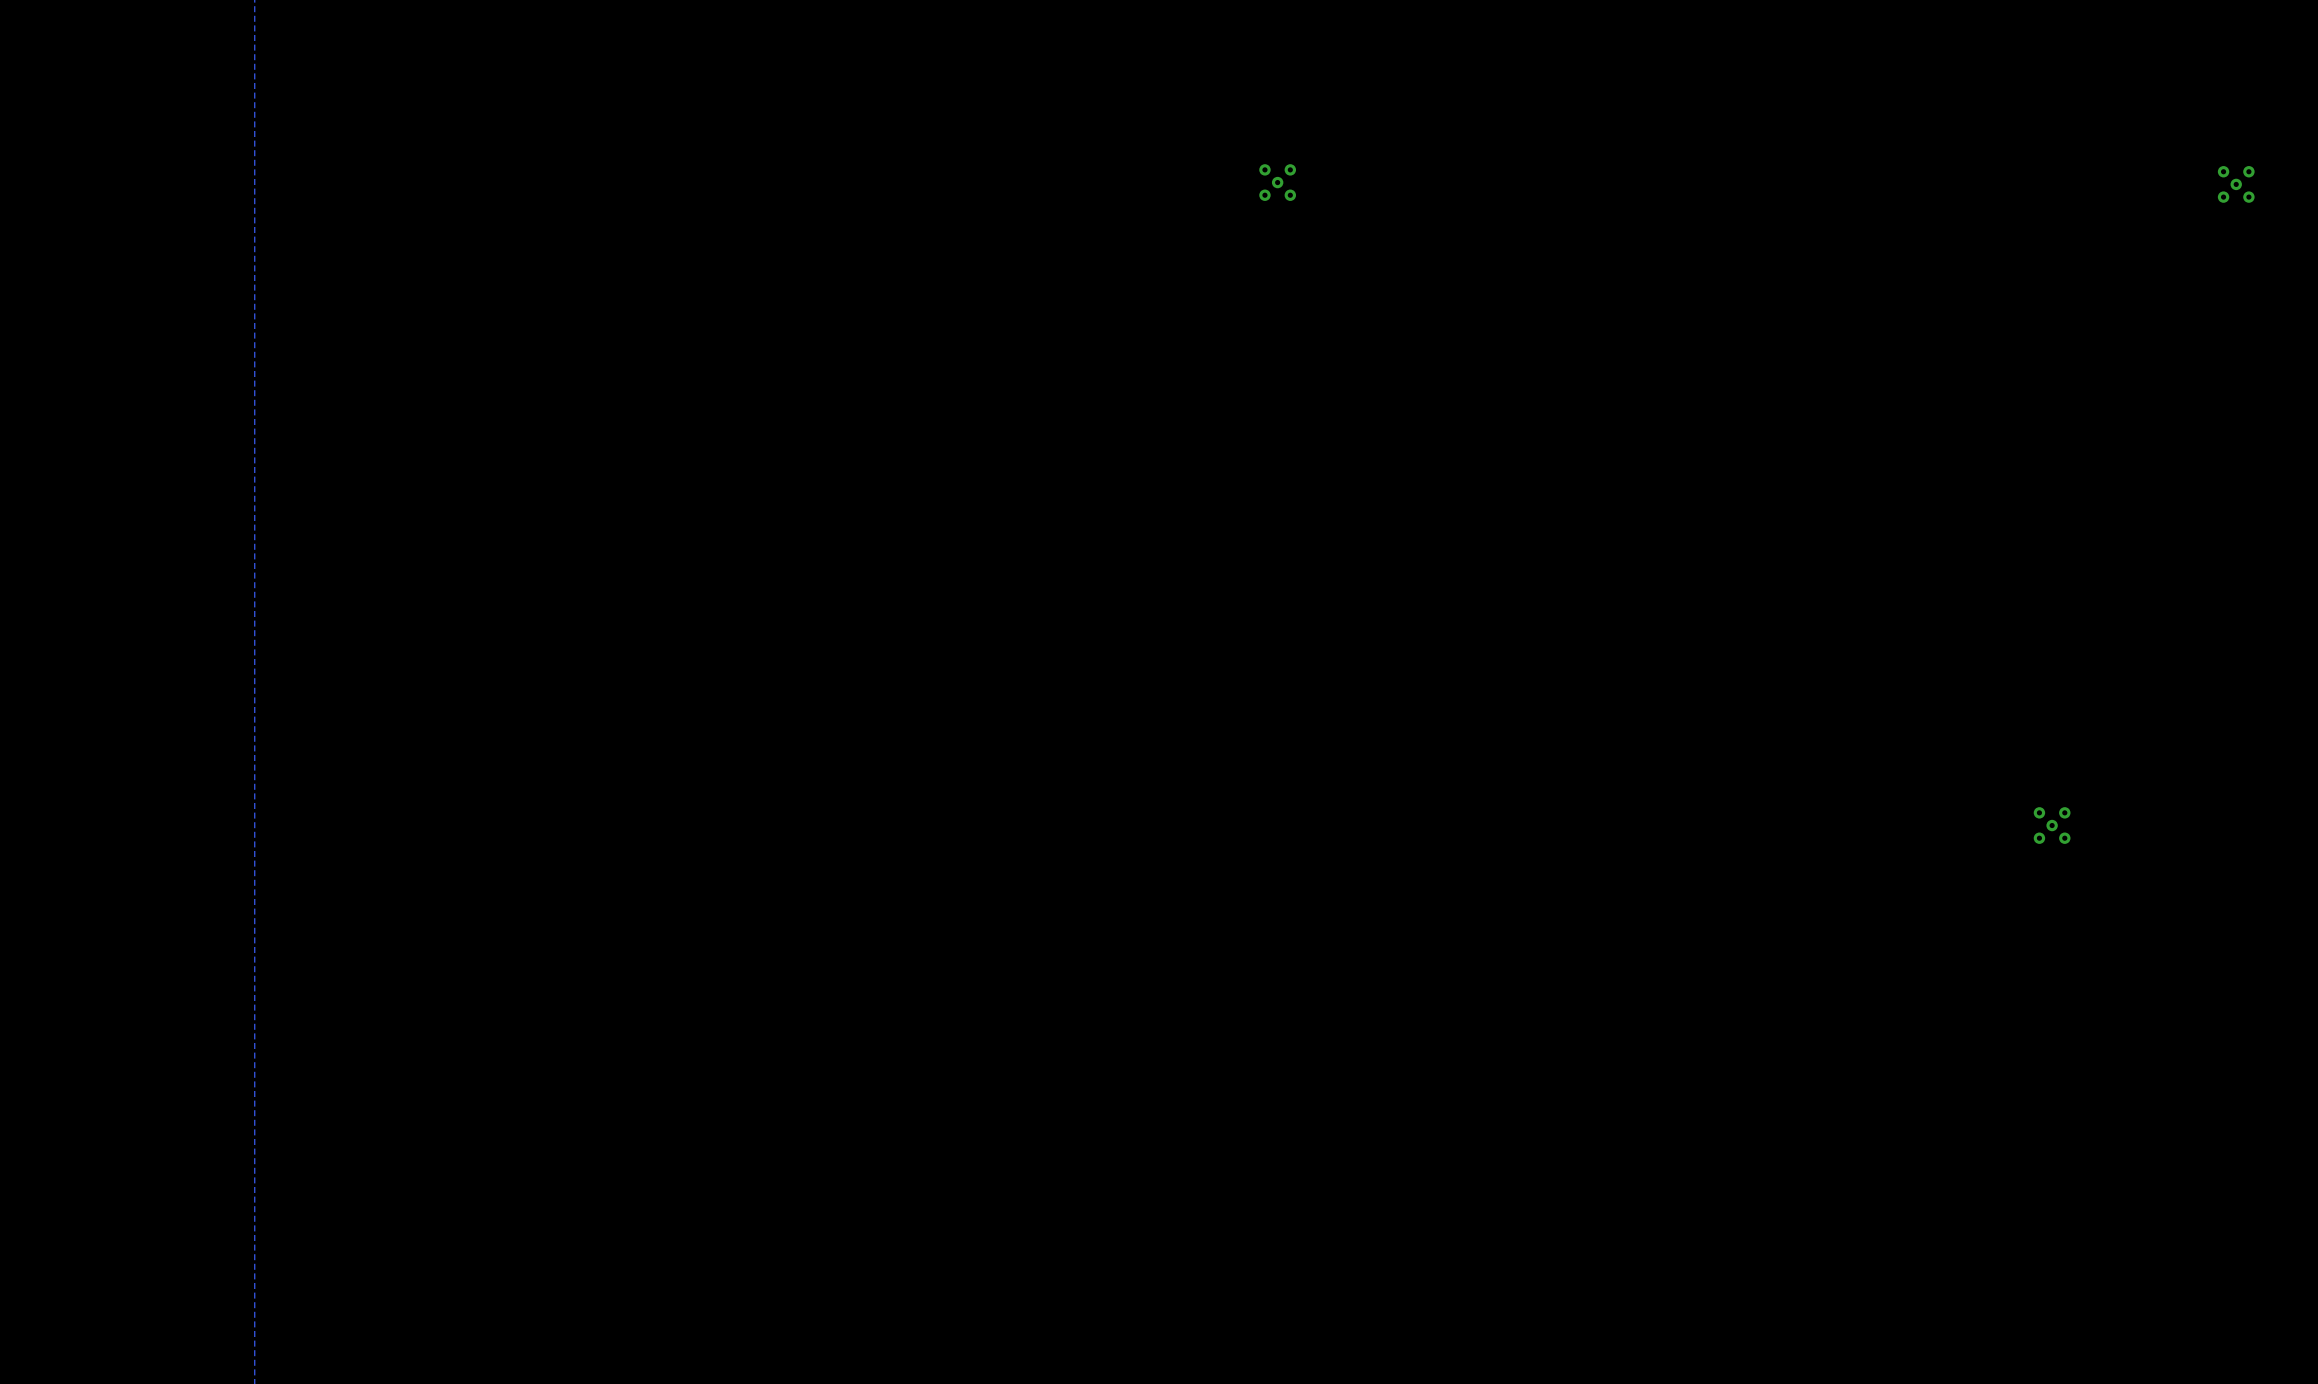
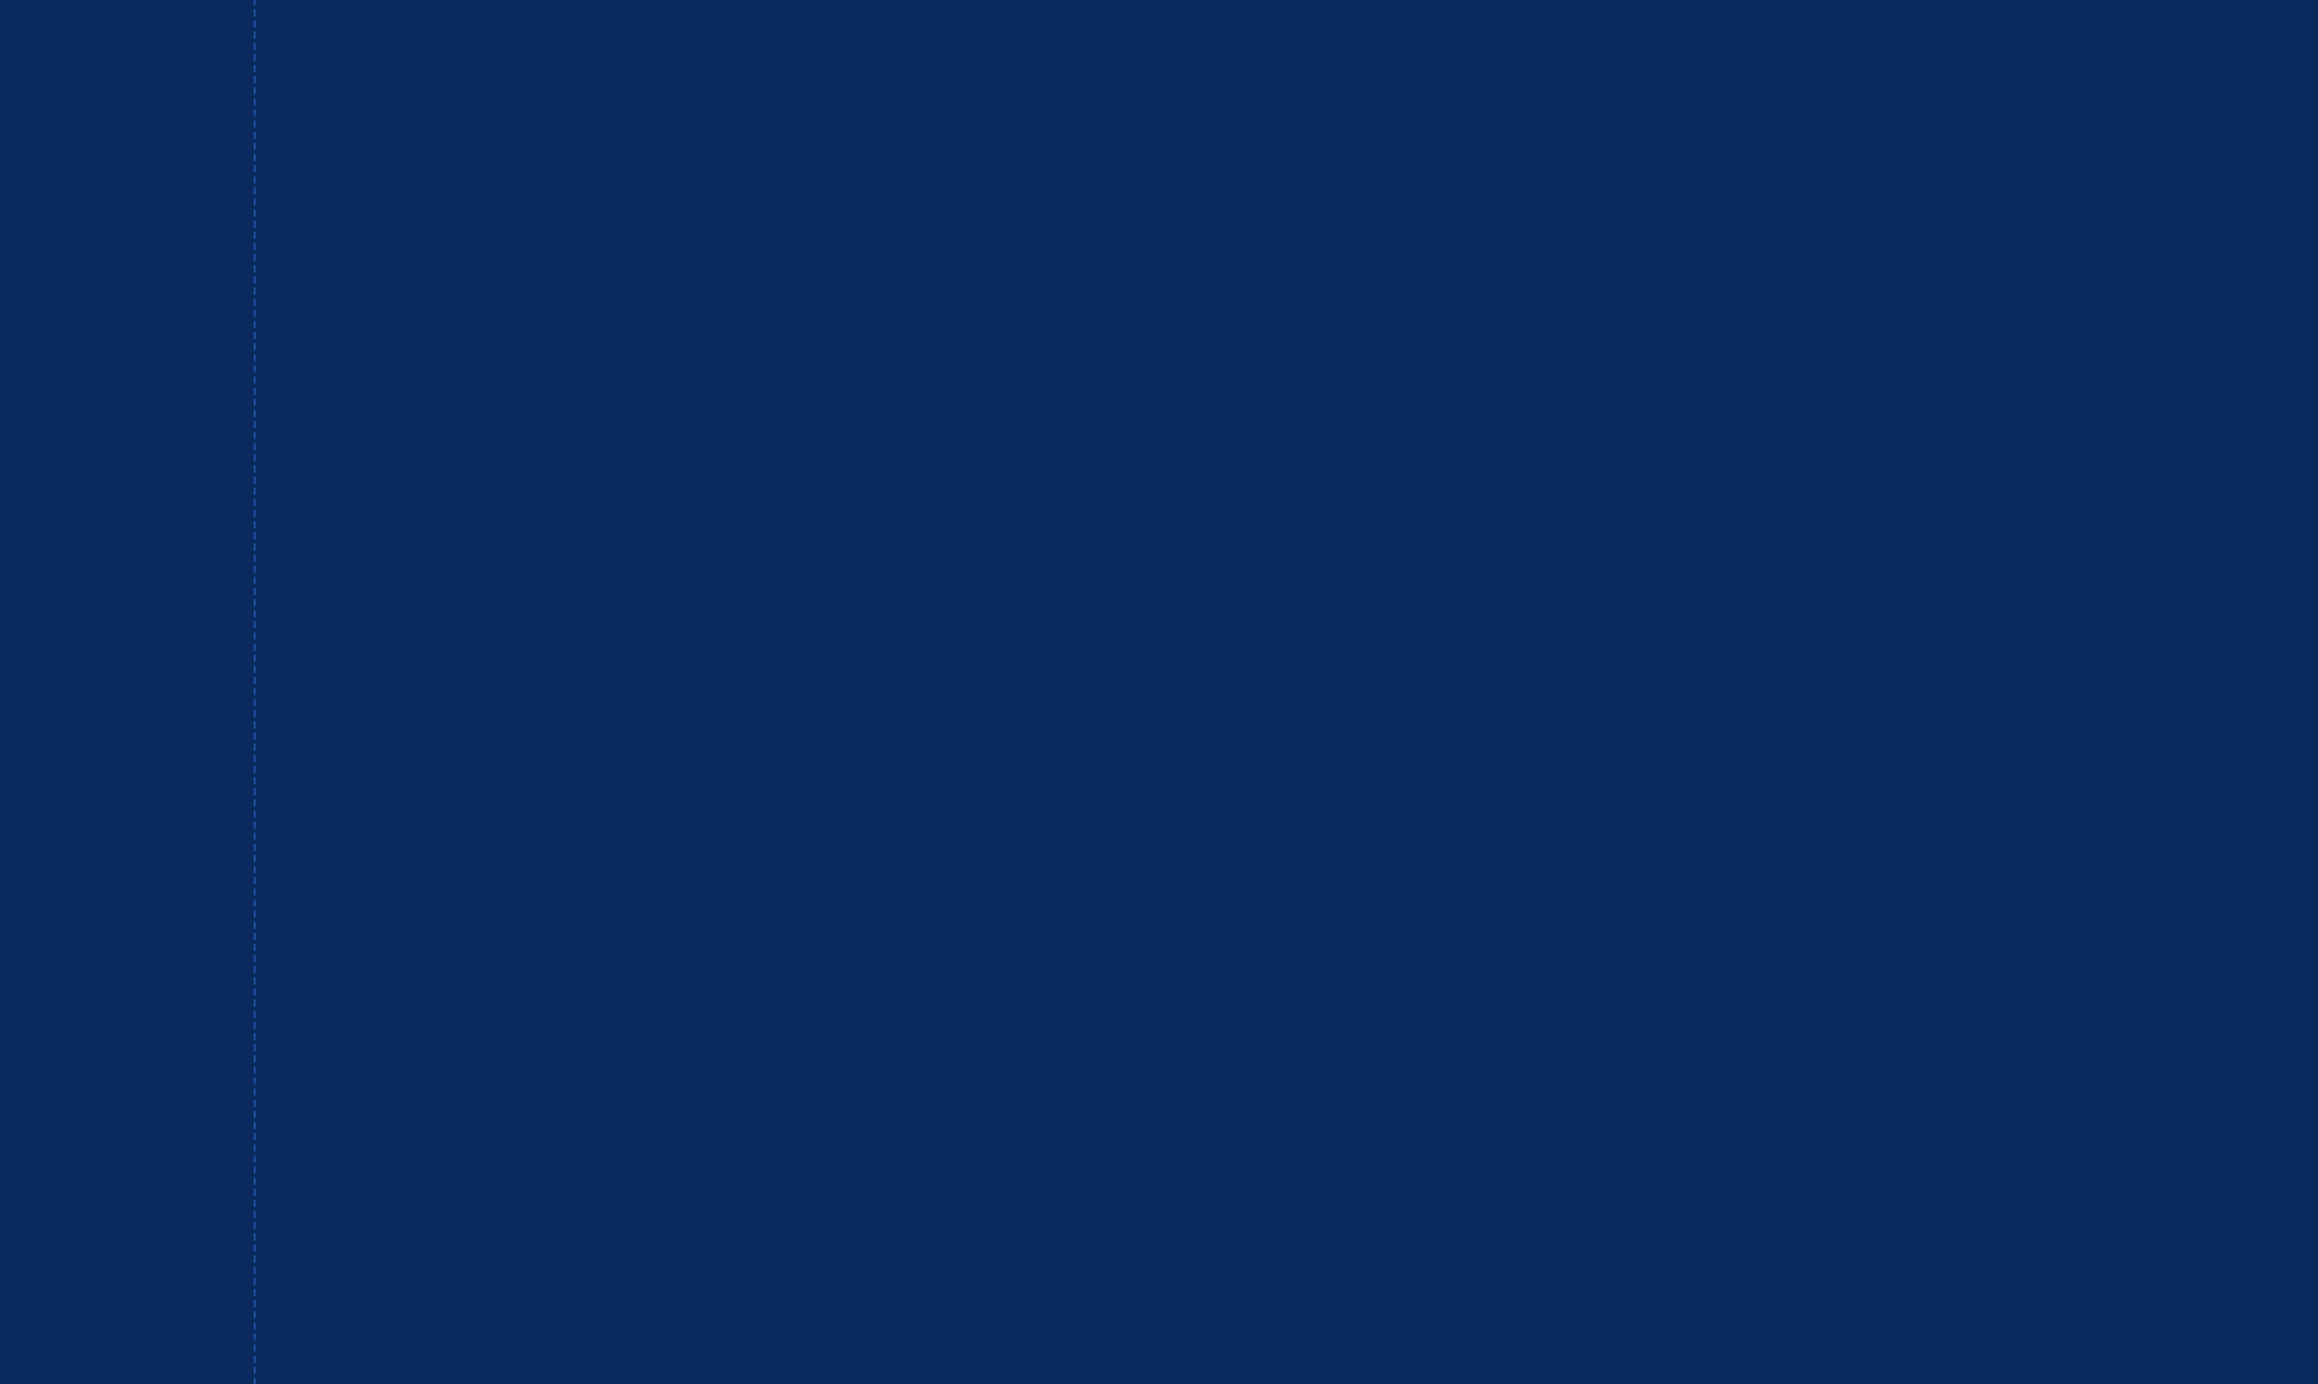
part: (1277, 182) -> none
part: (2236, 184) -> none
part: (2052, 825) -> none

